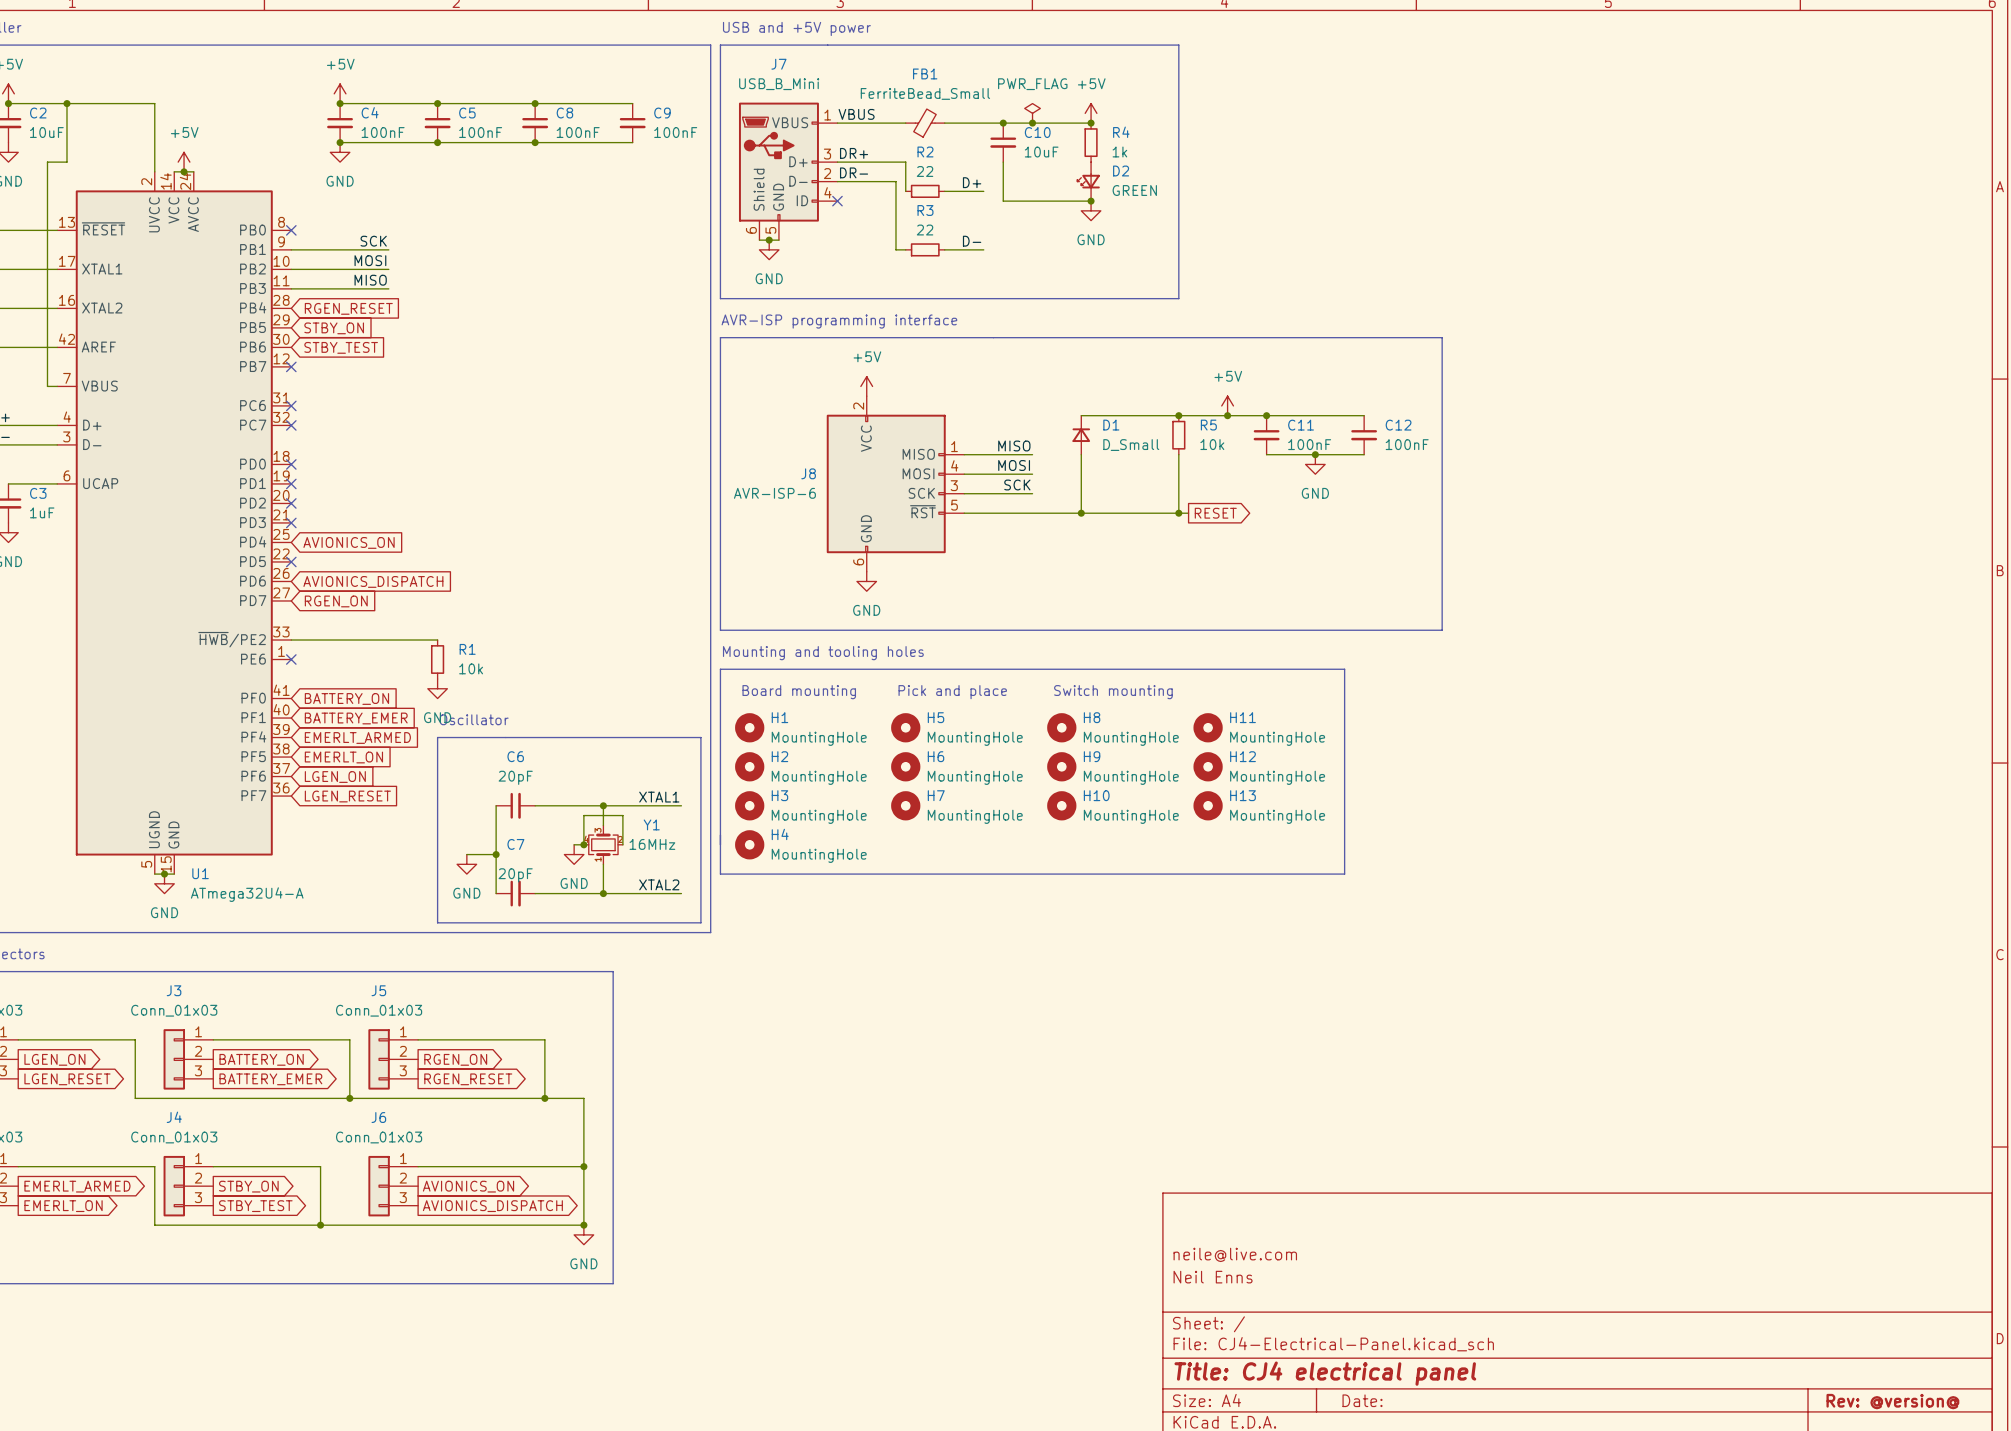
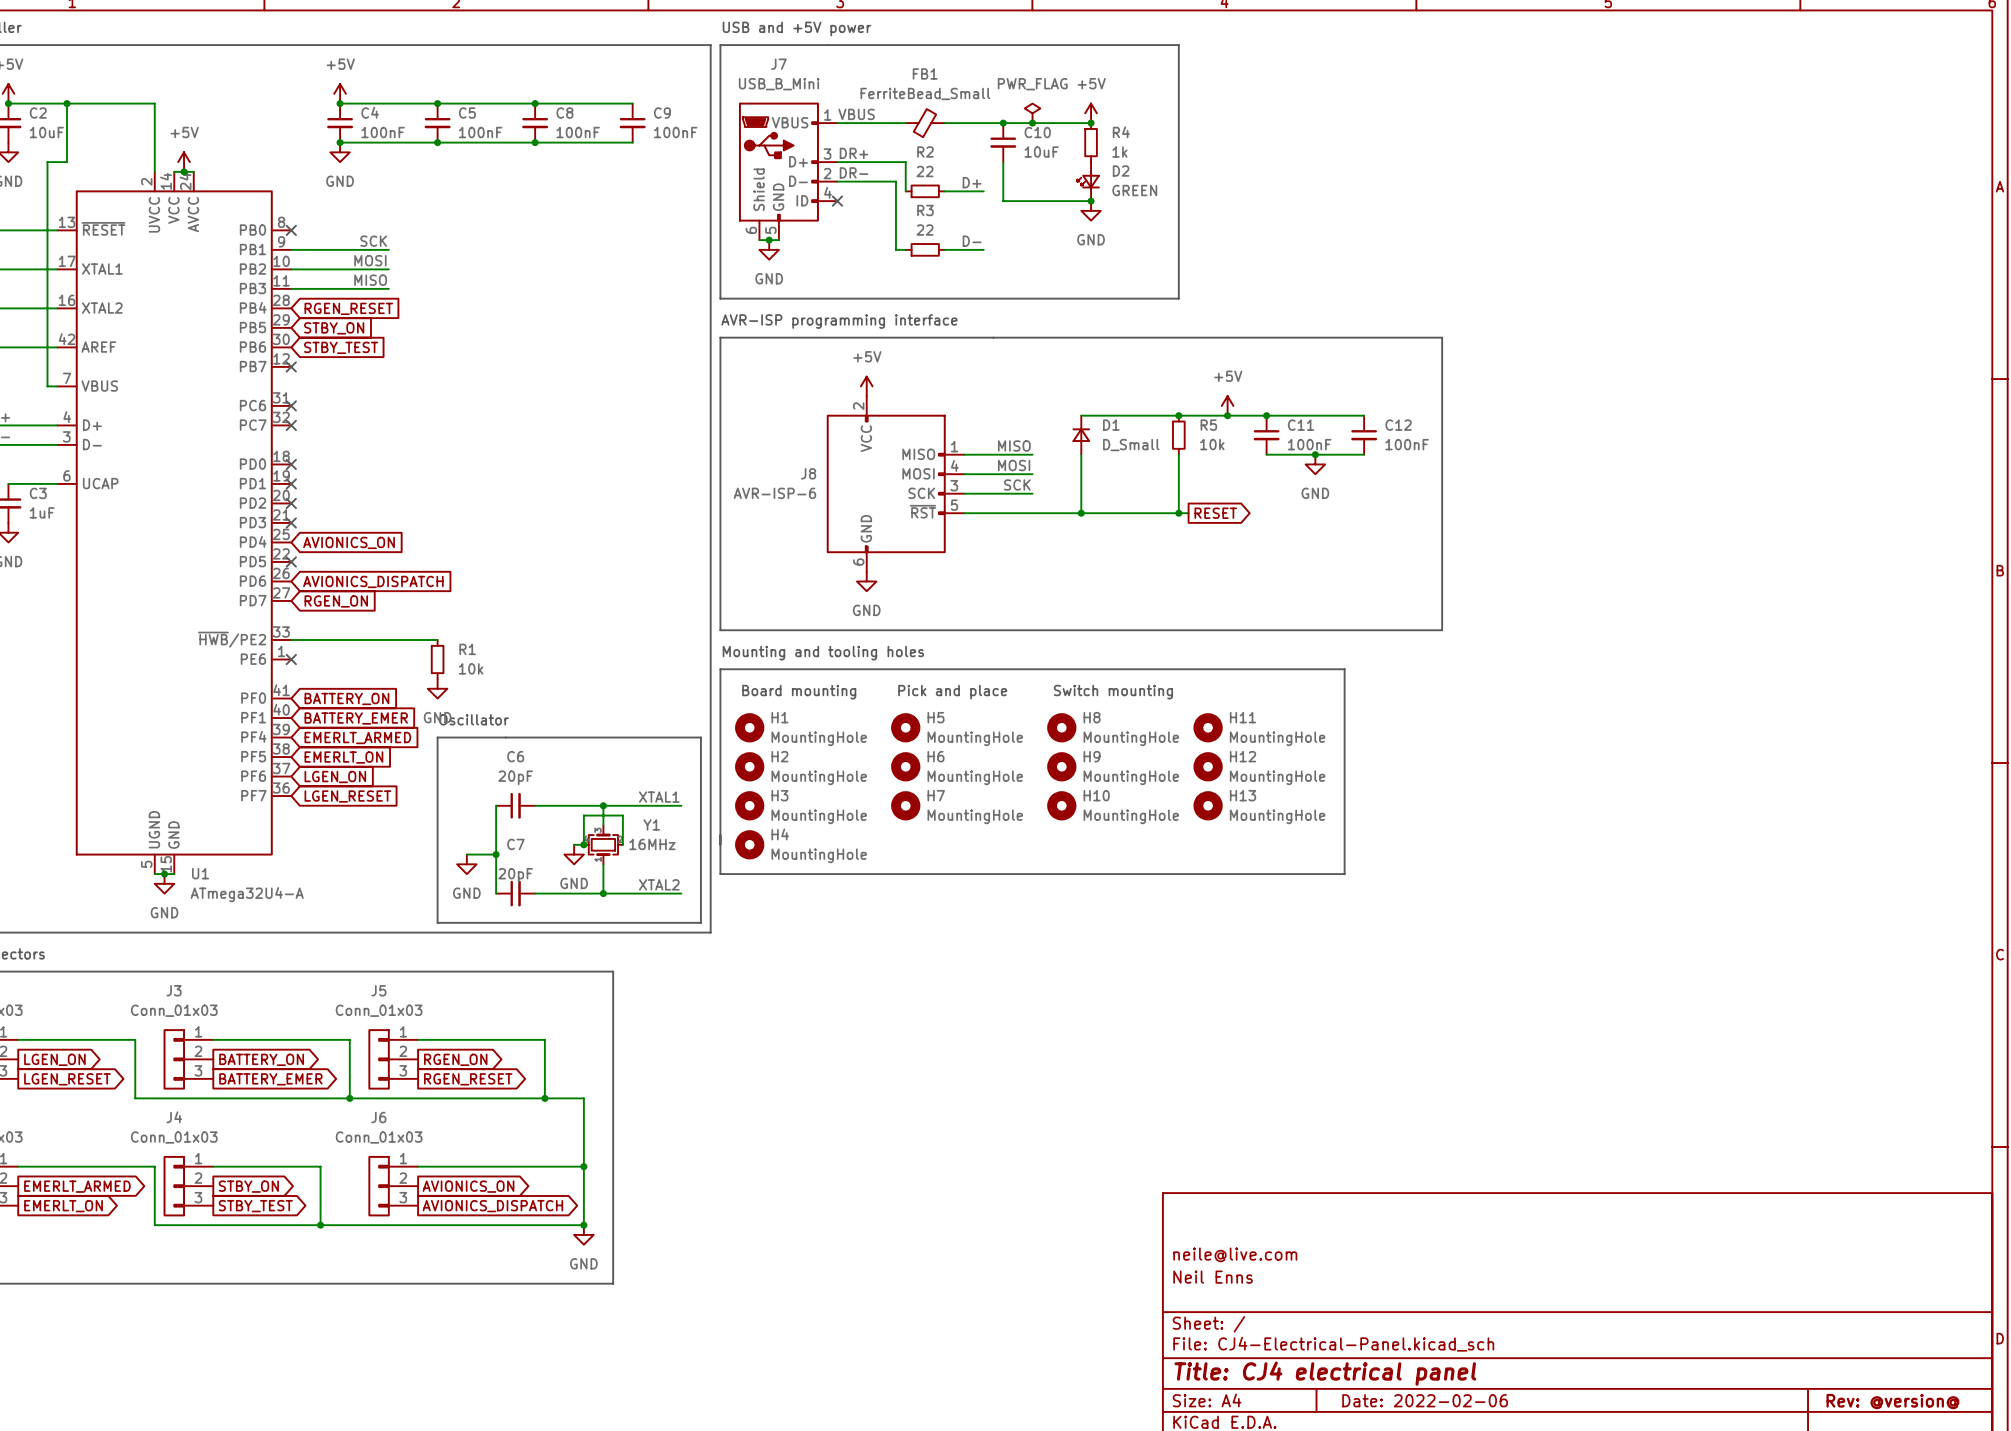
title block: Date: (1362, 1400) -> Date: 2022-02-06 (1425, 1400)

